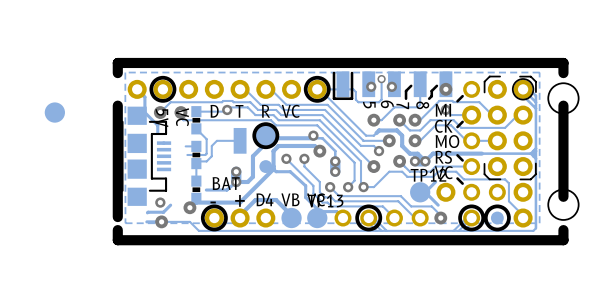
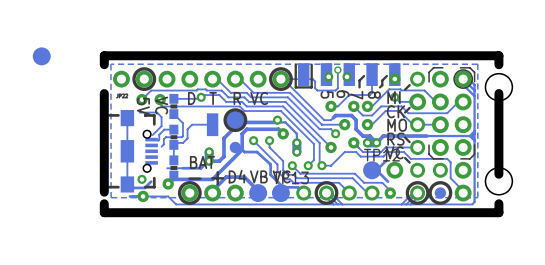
track: (137, 89) (144, 97) (144, 112) (157, 125) (157, 133) -> none
part position: (54, 112) -> (41, 56)
track: none -> (139, 112) (157, 112) (161, 117) (161, 126) (152, 135)
track: none -> (127, 118) (127, 184)
track: none -> (164, 129) (159, 134) (158, 140)
track: none -> (165, 137) (161, 146)
part: (146, 156) -> none
part: none -> (132, 151)
track: none -> (182, 168) (167, 168)

